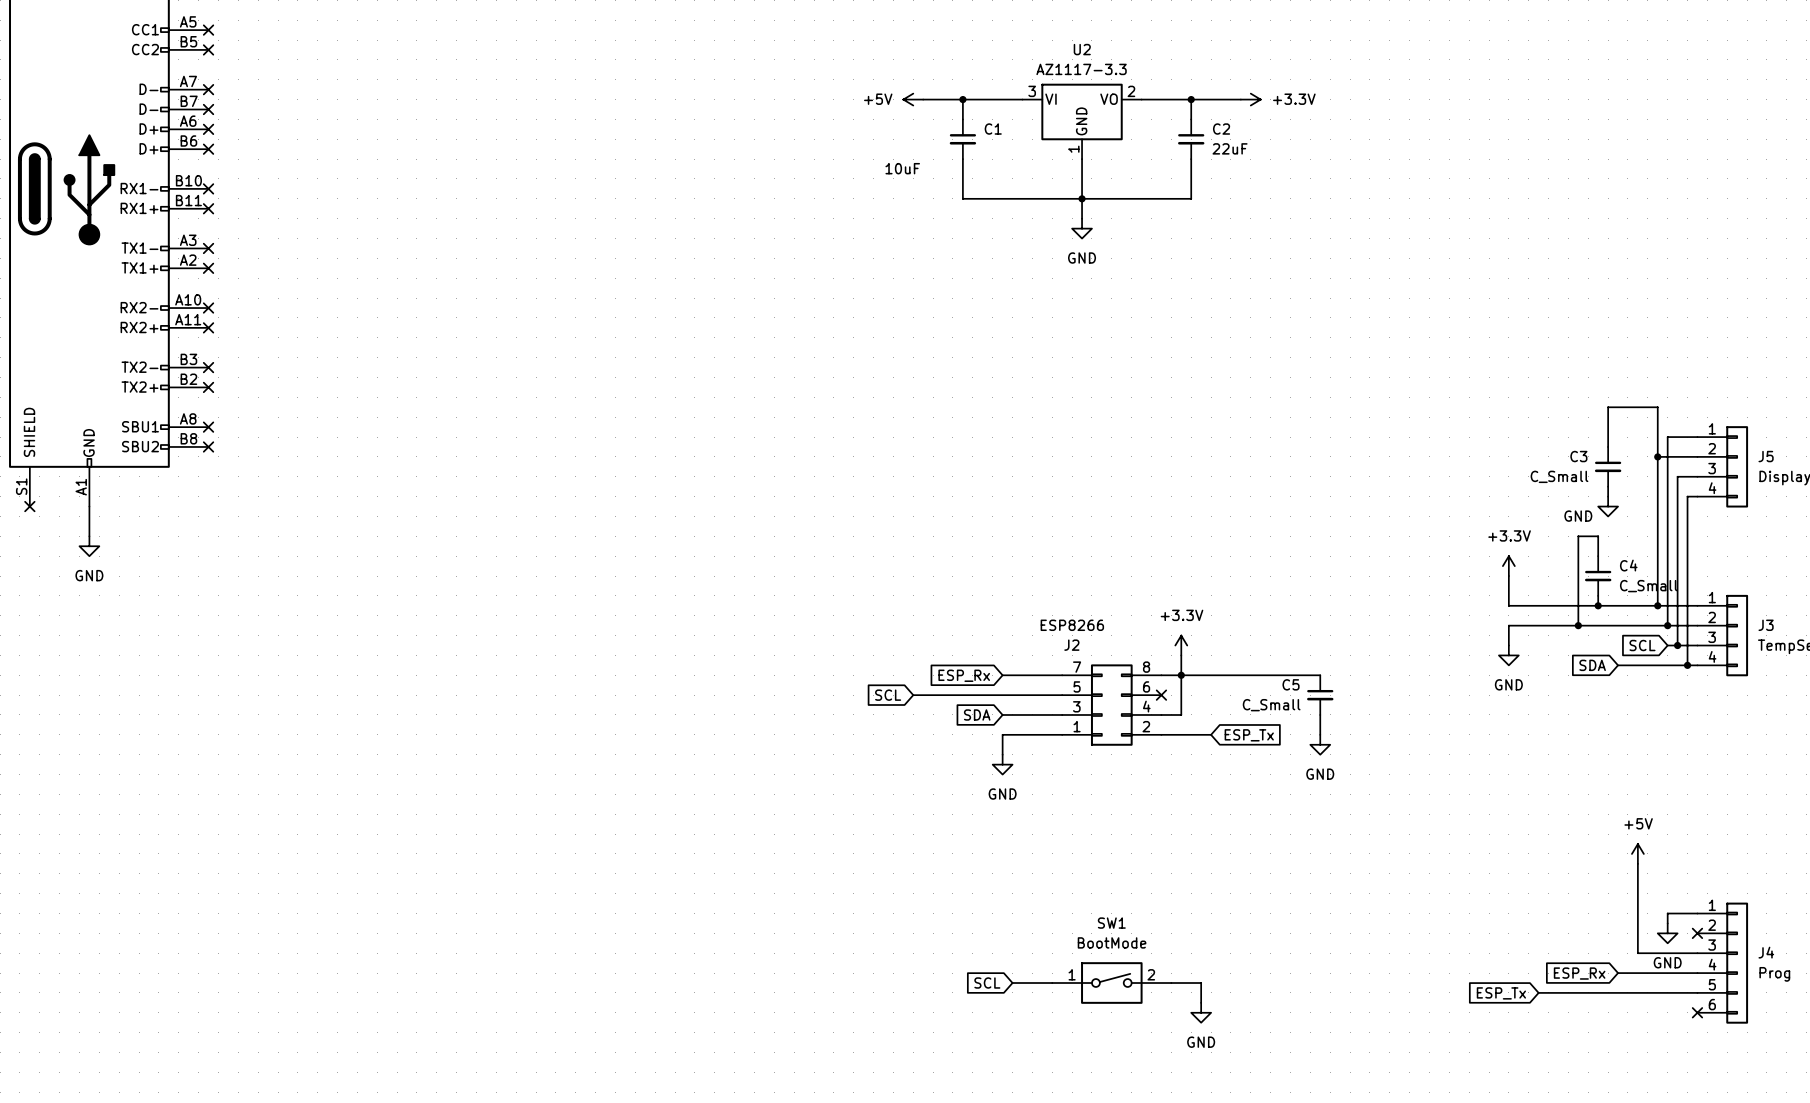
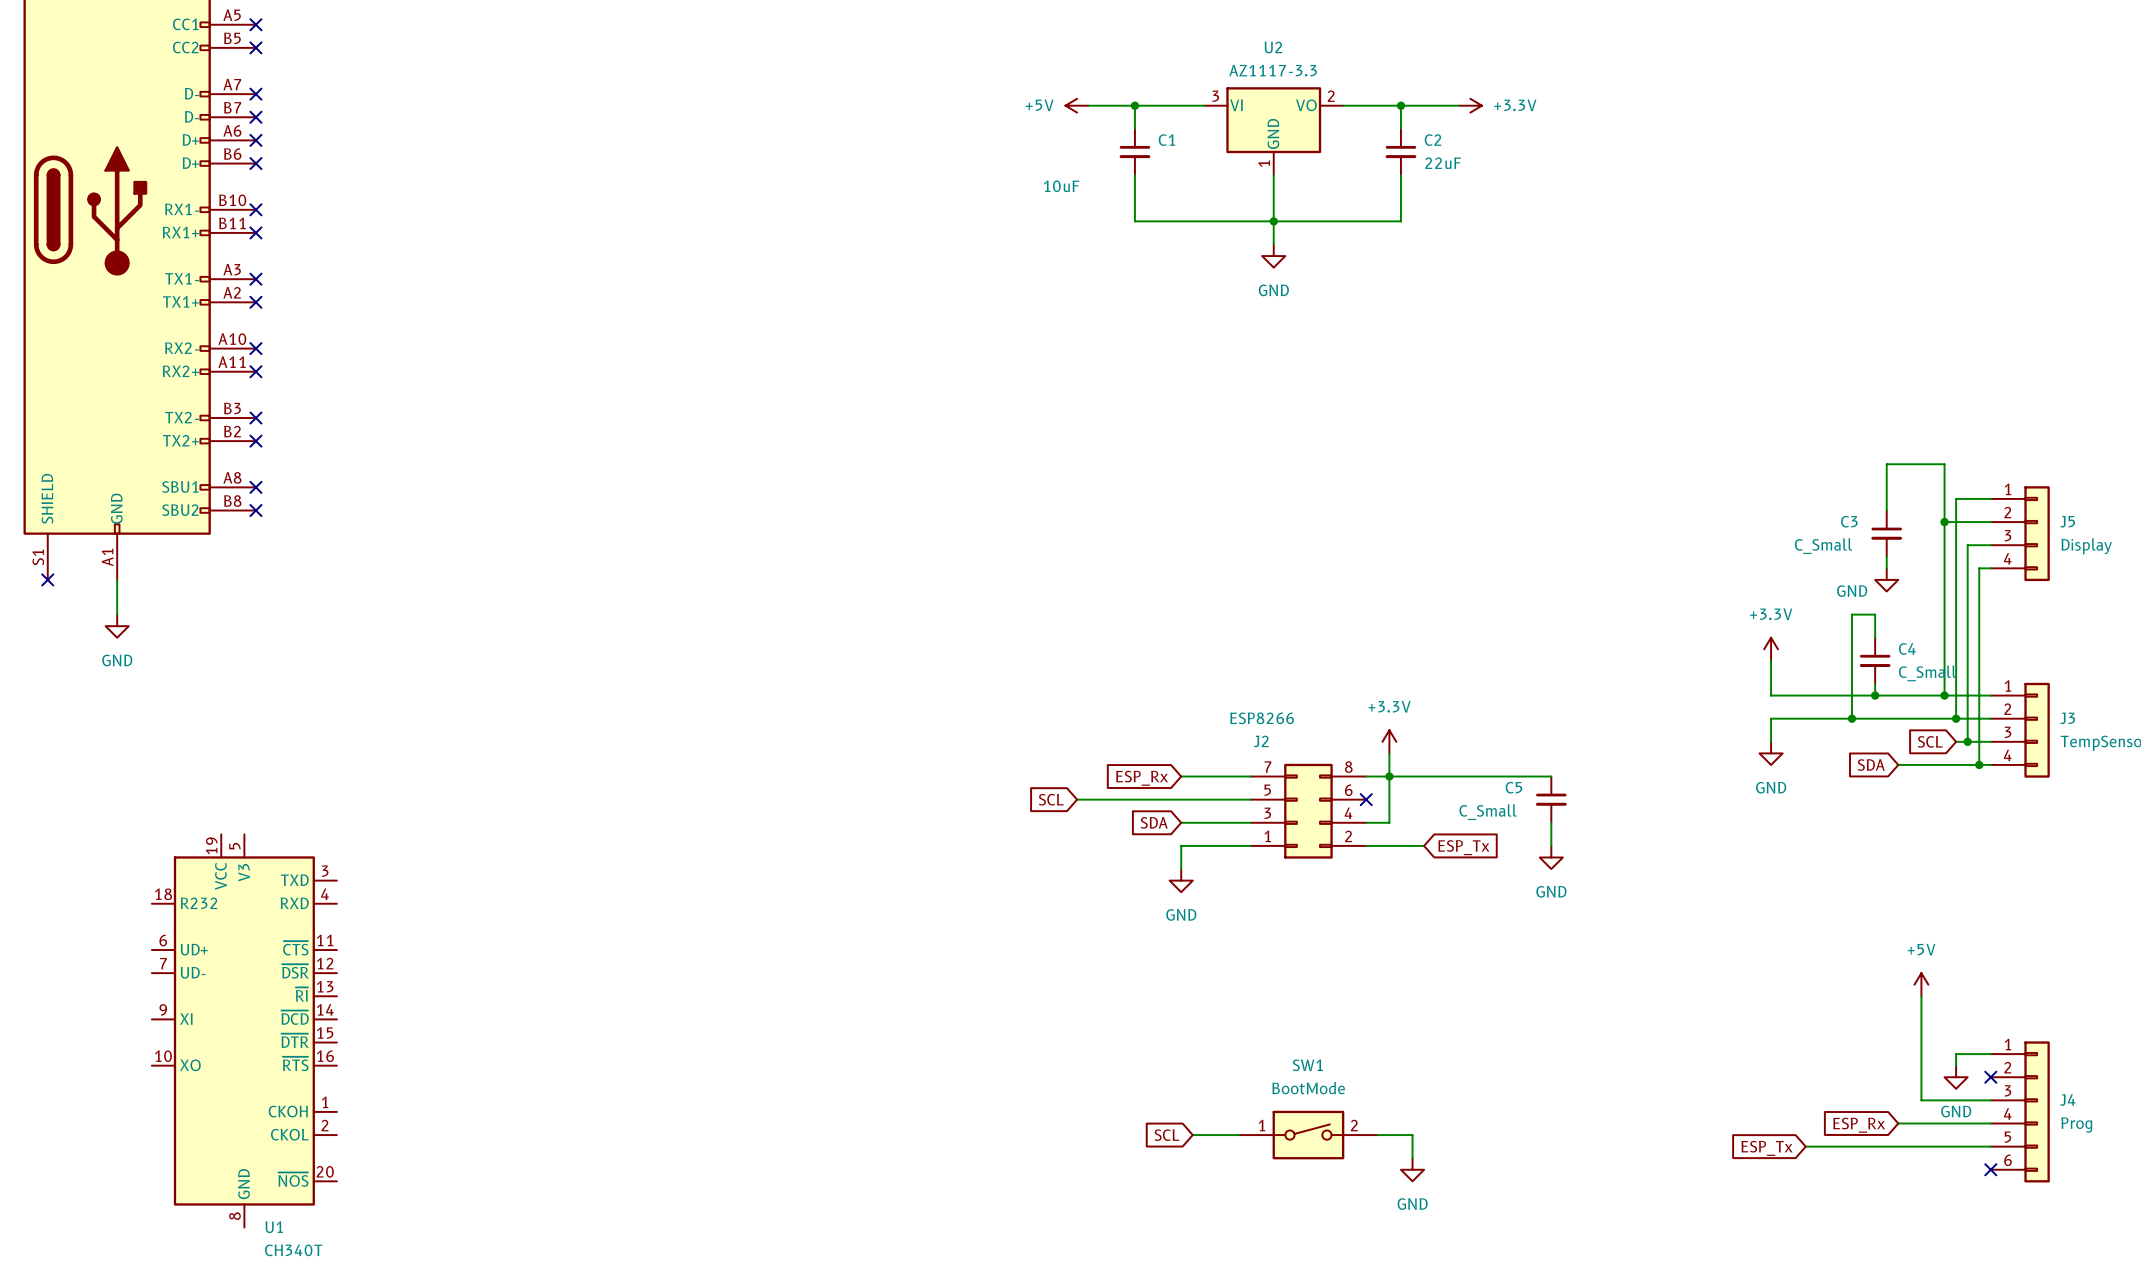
U1: none -> CH340T (244, 1030)

